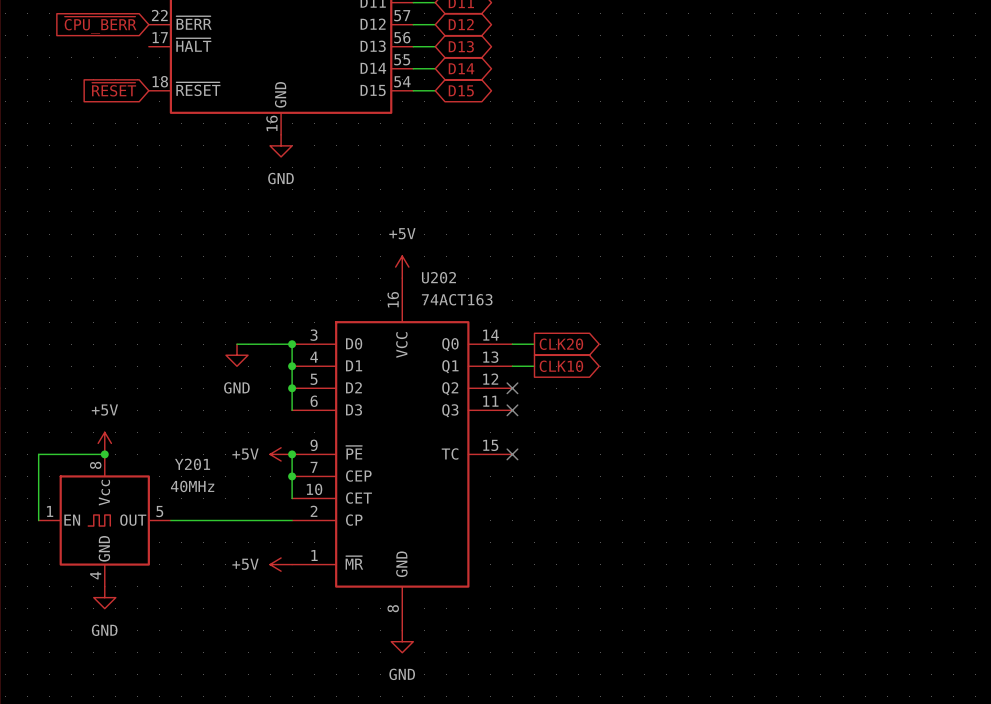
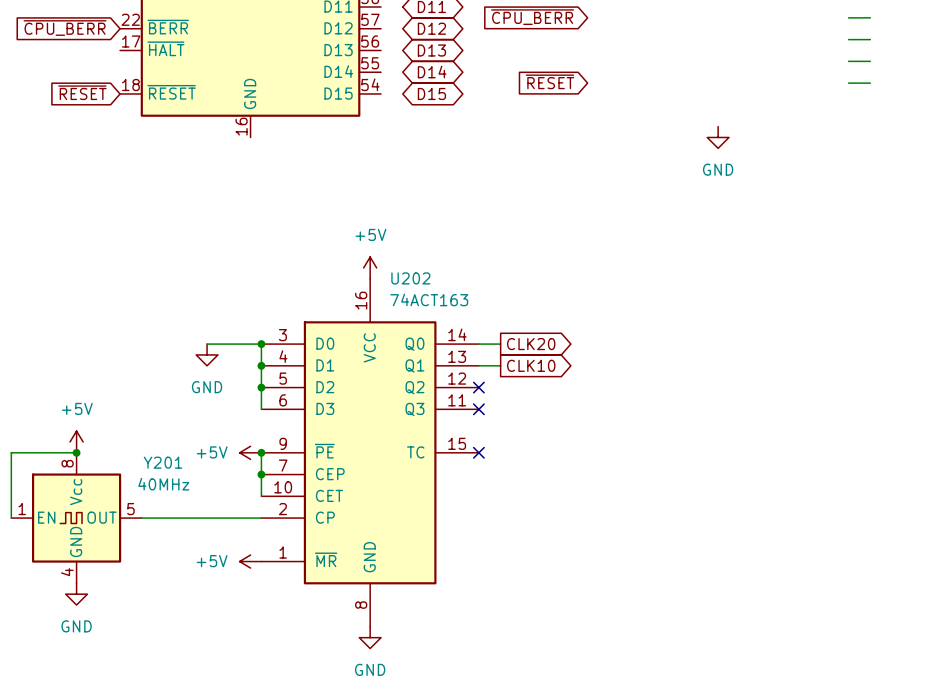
wire: (413, 2) (435, 2) -> none
wire: none -> (848, 17) (870, 17)
global label: none -> ~{CPU_BERR} (532, 17)
wire: (413, 24) (435, 24) -> none
wire: none -> (848, 39) (870, 39)
wire: (413, 46) (435, 46) -> none
wire: none -> (848, 61) (870, 61)
wire: (413, 68) (435, 68) -> none
global label: none -> ~{RESET} (549, 81)
wire: none -> (848, 83) (870, 83)
wire: (413, 90) (435, 90) -> none
power symbol: none -> GND (718, 137)
power symbol: GND (281, 145) -> none

